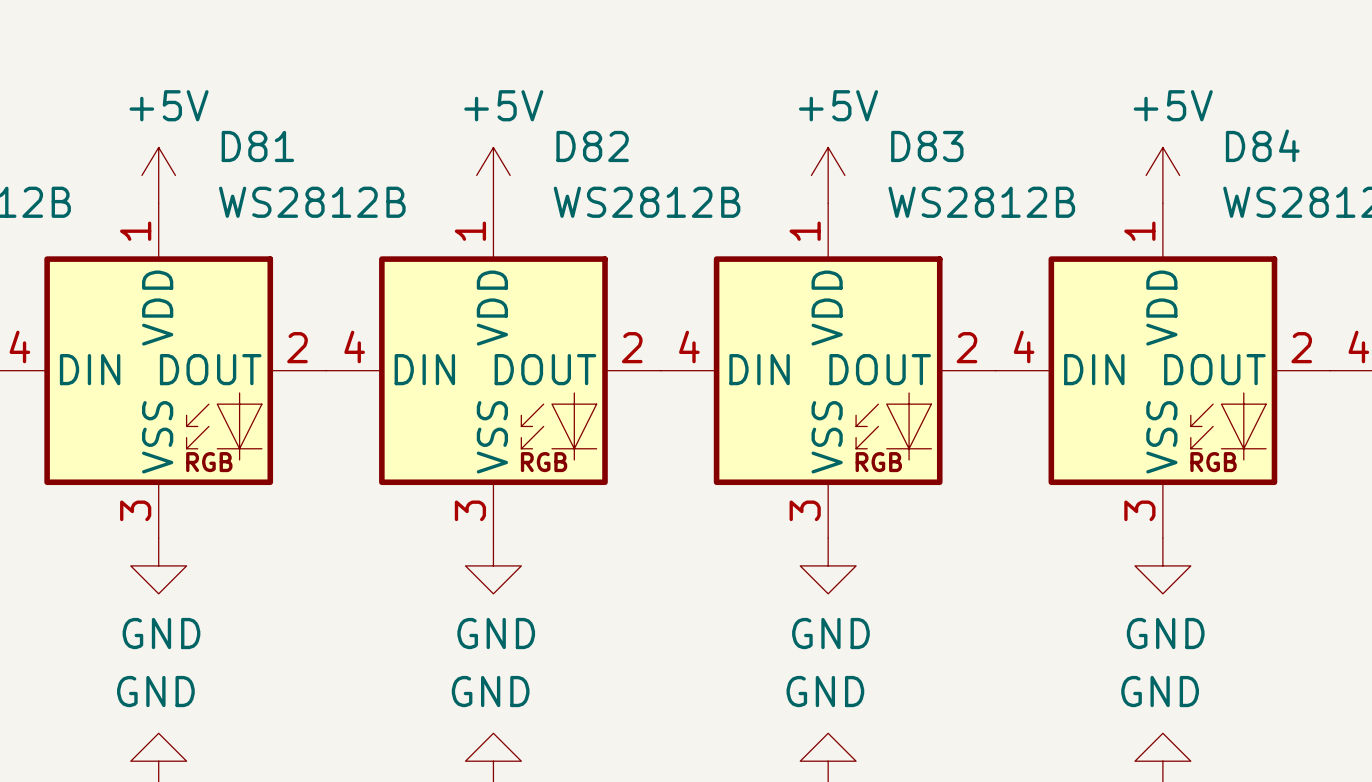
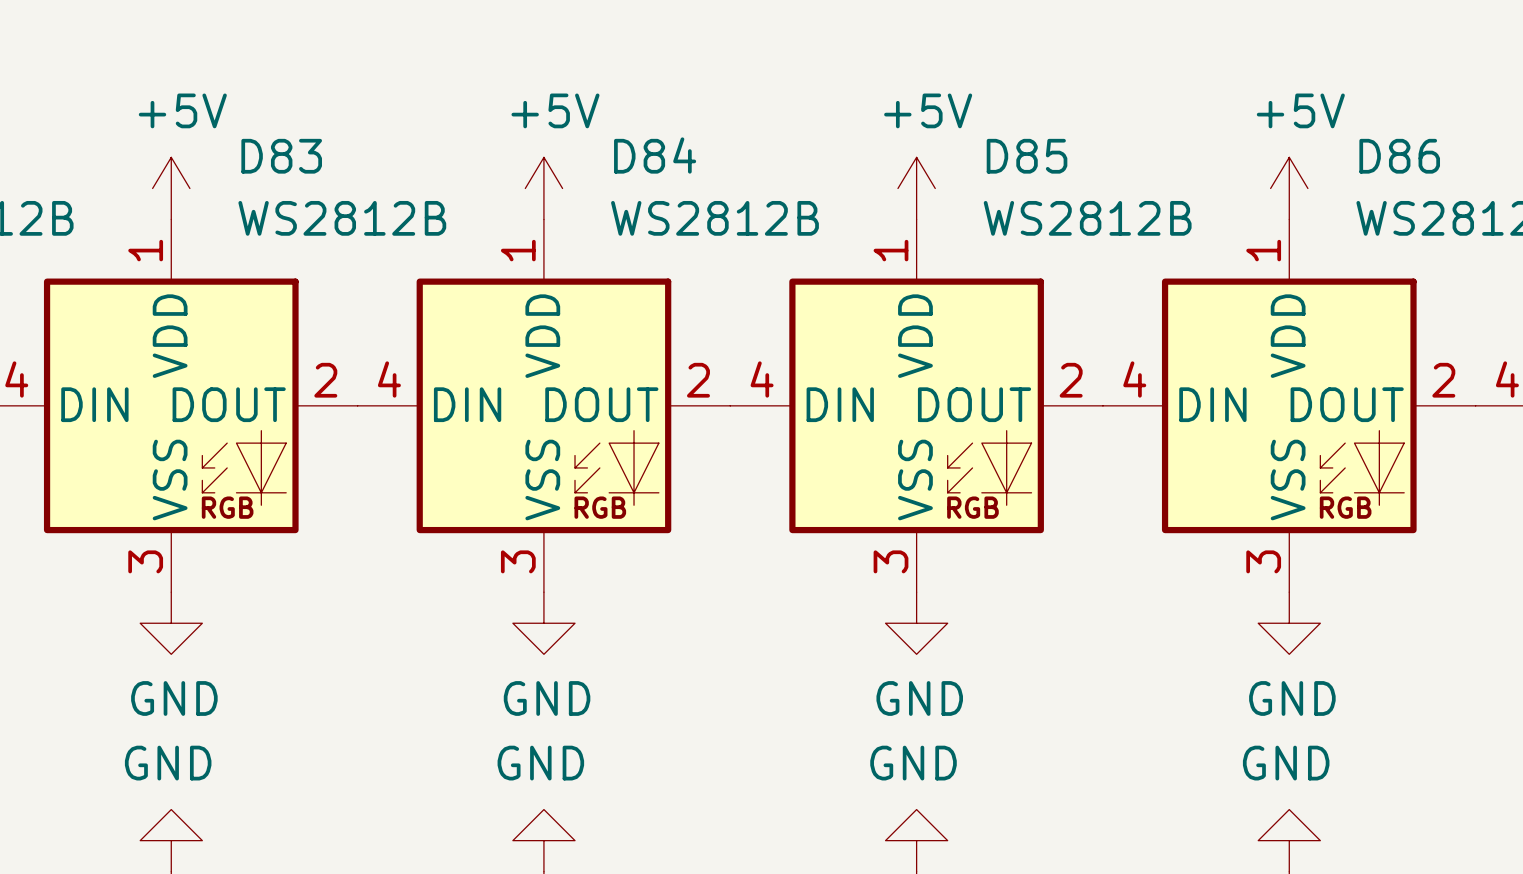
D84 name: D84 (1262, 145) -> D86 (1399, 156)
D81 name: D81 (257, 146) -> D83 (281, 156)
D82 name: D82 (592, 146) -> D84 (655, 155)
D83 name: D83 (927, 146) -> D85 (1027, 156)

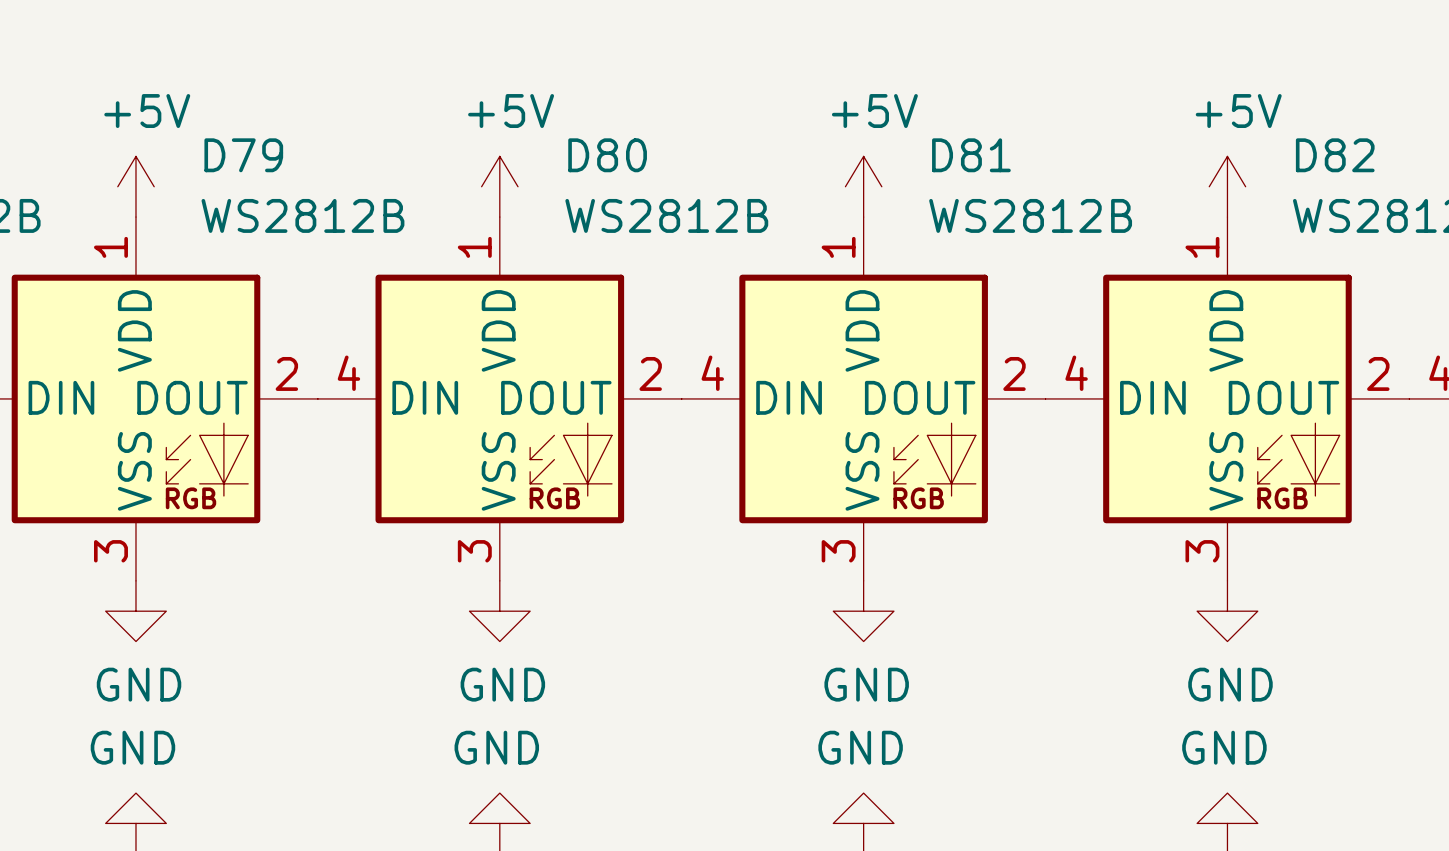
D84 name: D84 (655, 155) -> D80 (607, 155)
D83 name: D83 (281, 156) -> D79 (243, 155)
D85 name: D85 (1027, 156) -> D81 (971, 155)
D86 name: D86 (1399, 156) -> D82 (1335, 155)

